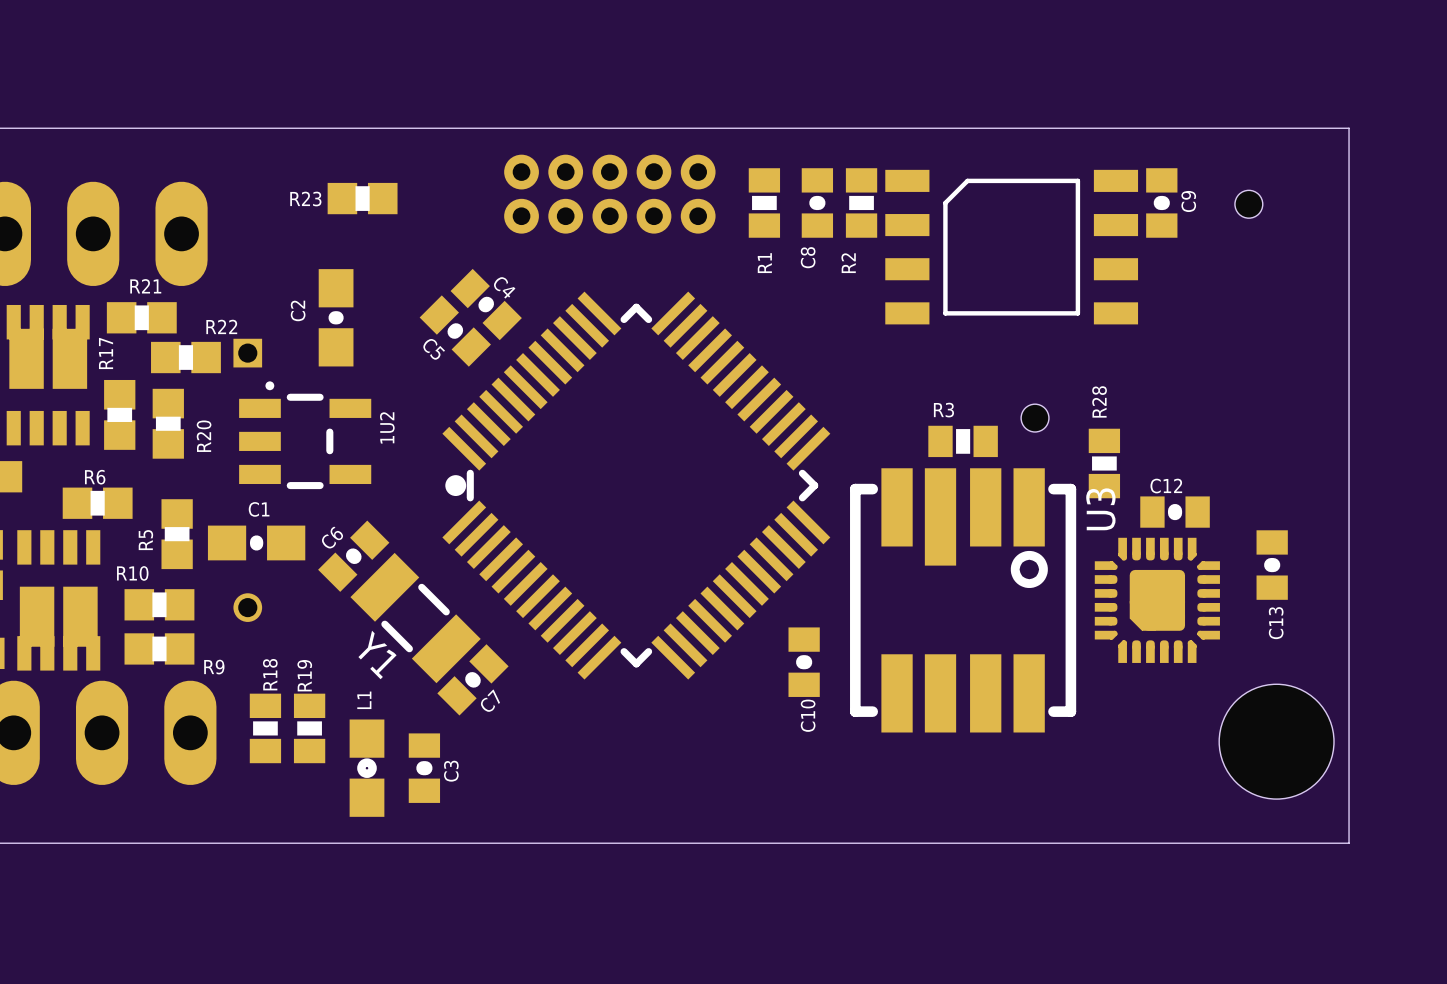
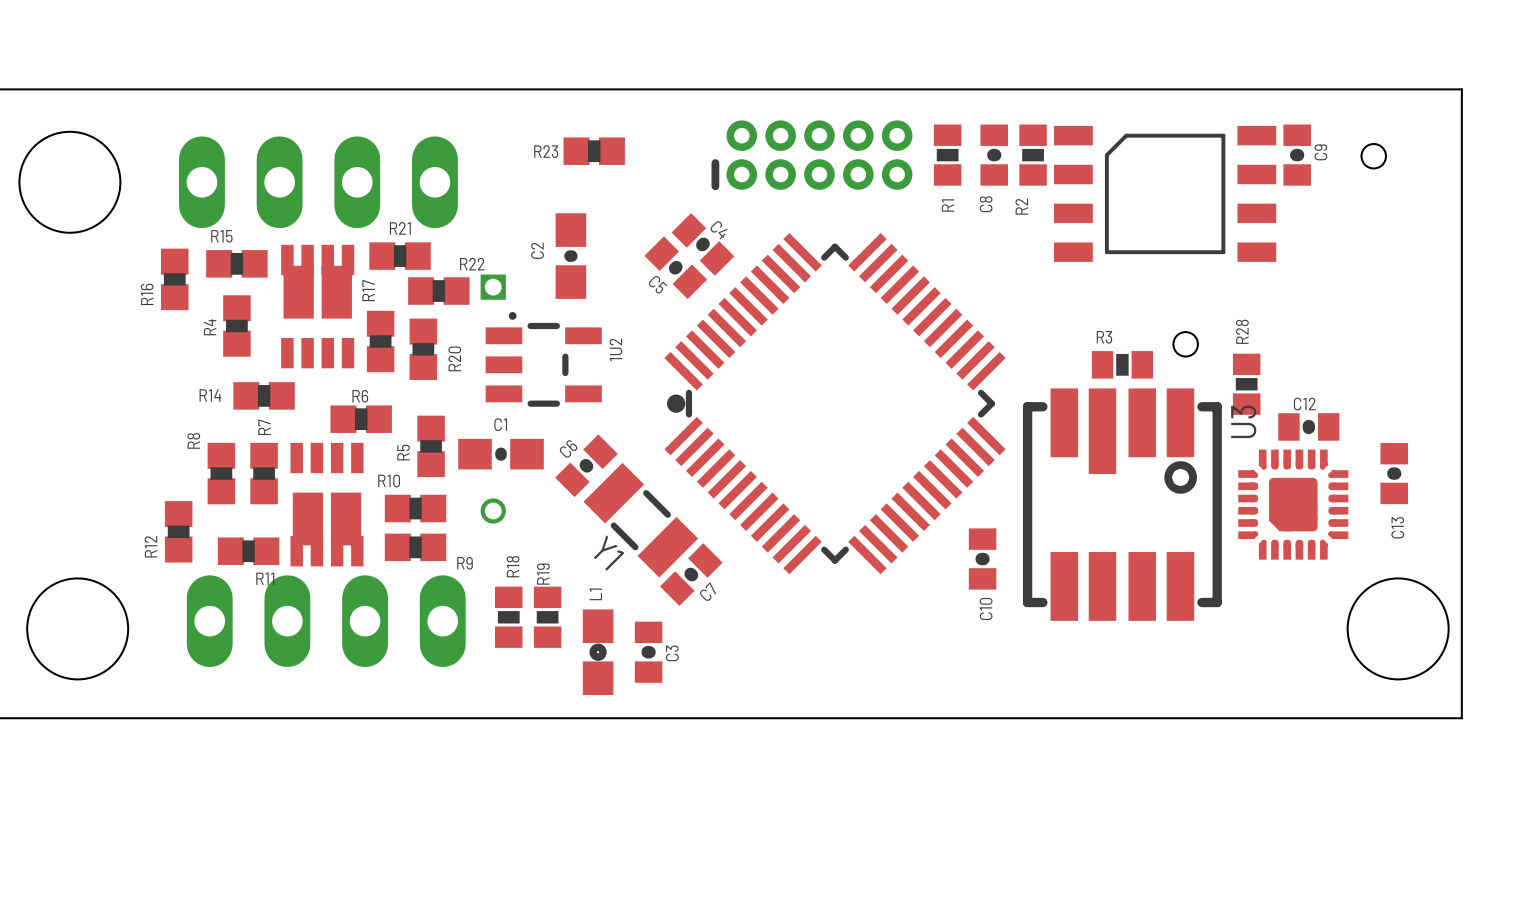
part side: bottom (609, 194) -> top (811, 155)

